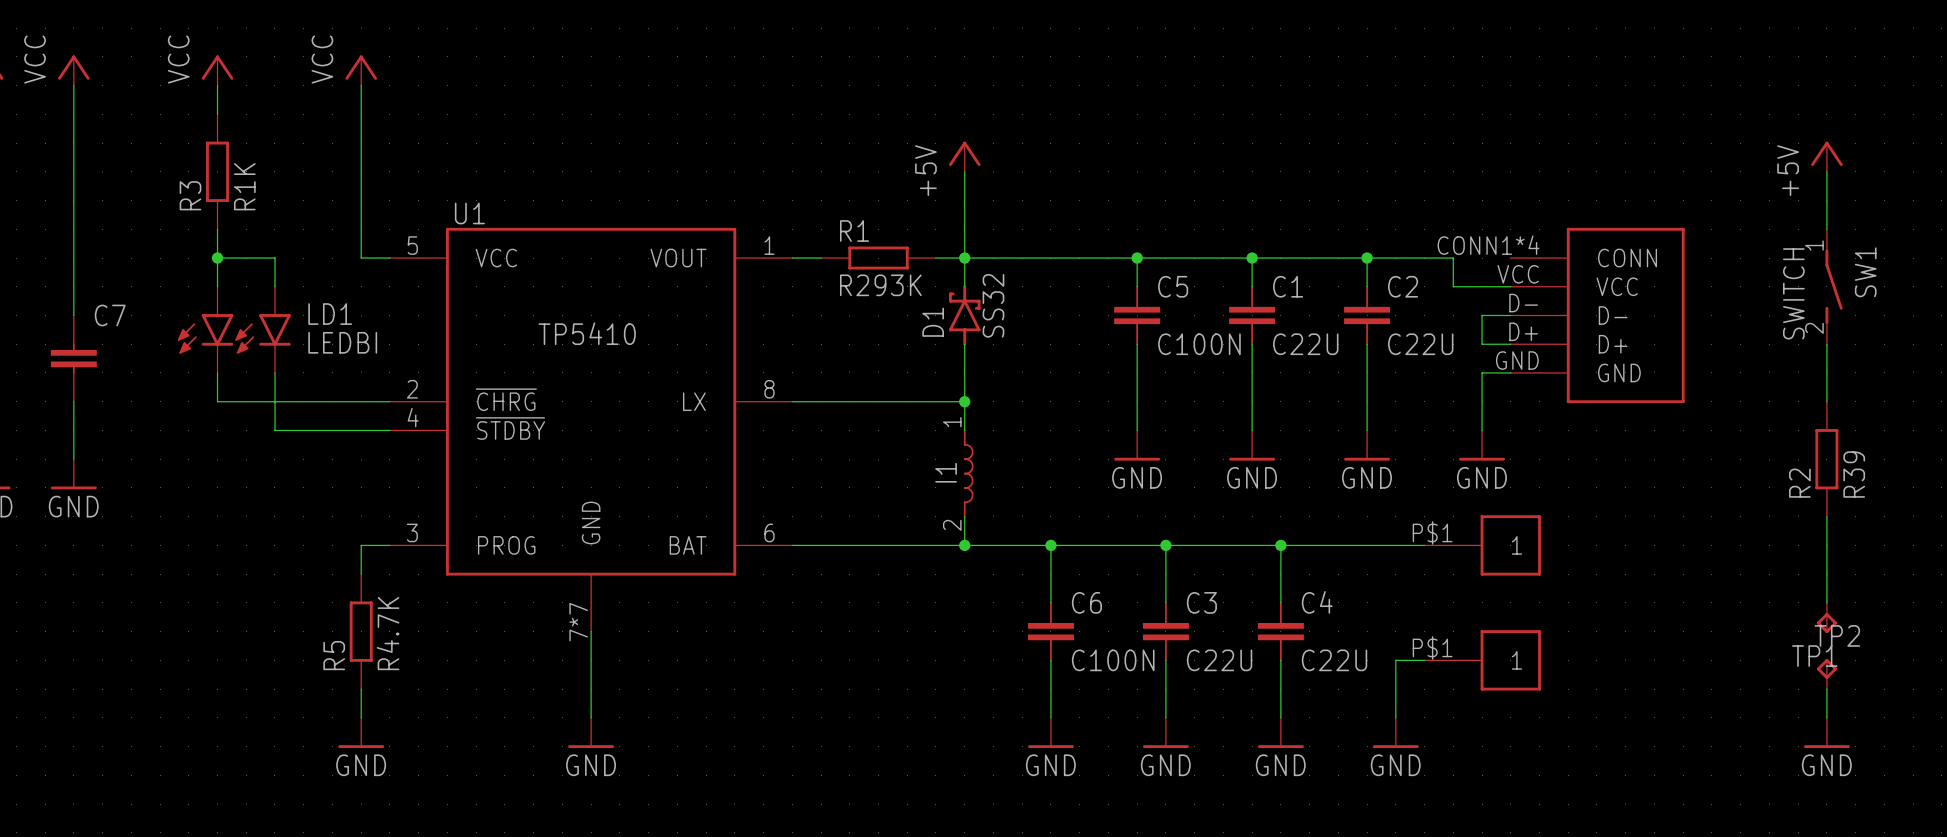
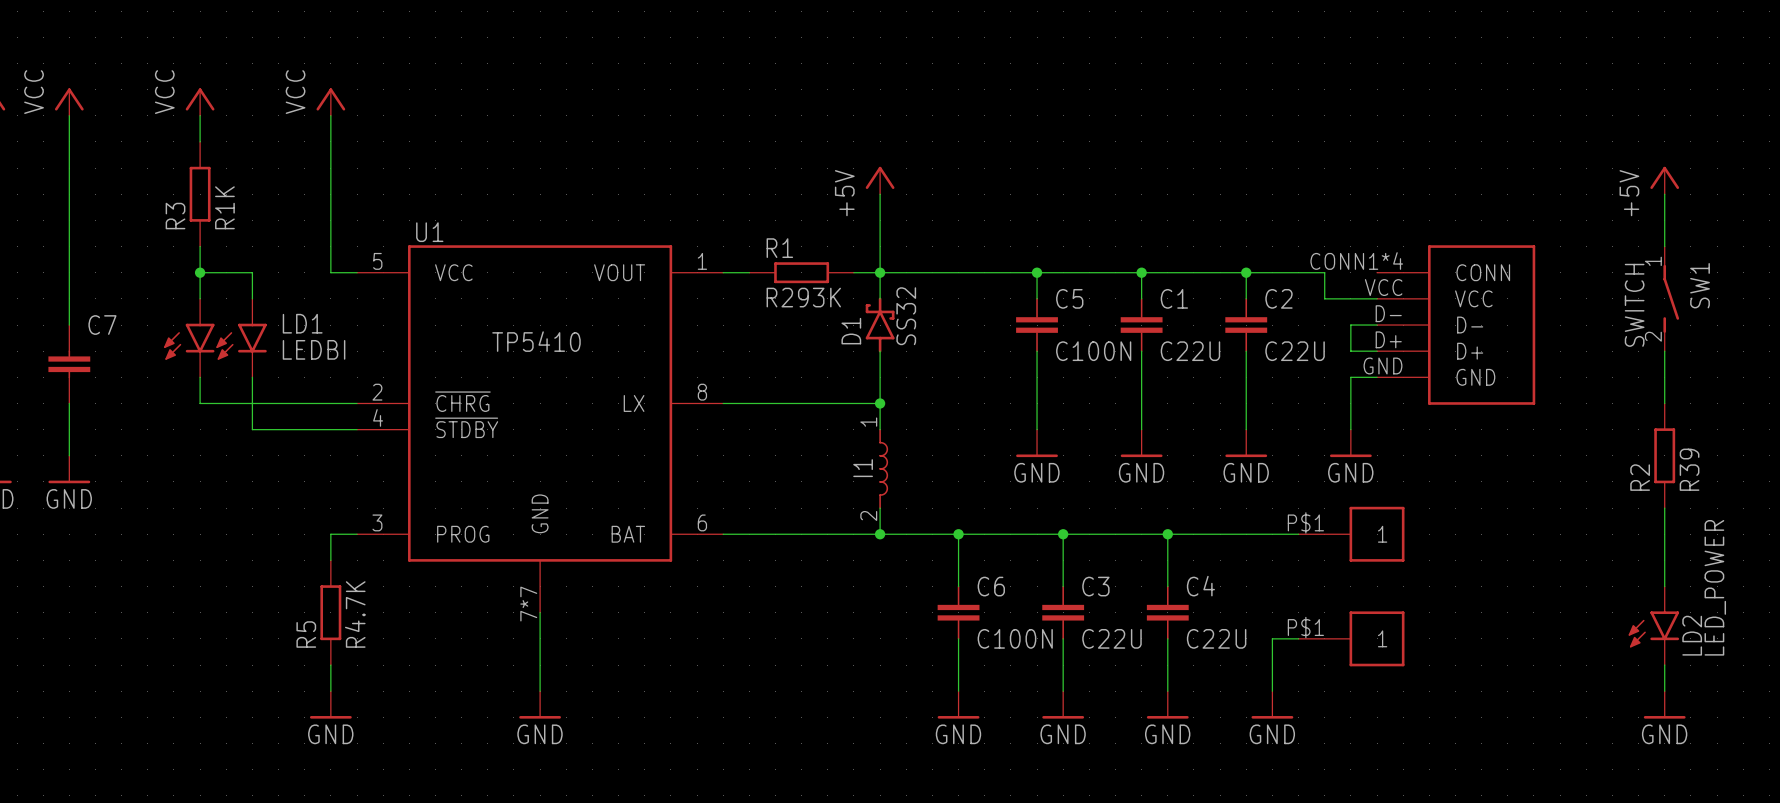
TP1: (1826, 617) -> none
LD2: none -> LED_POWER (1653, 625)
TP2: (1826, 674) -> none

